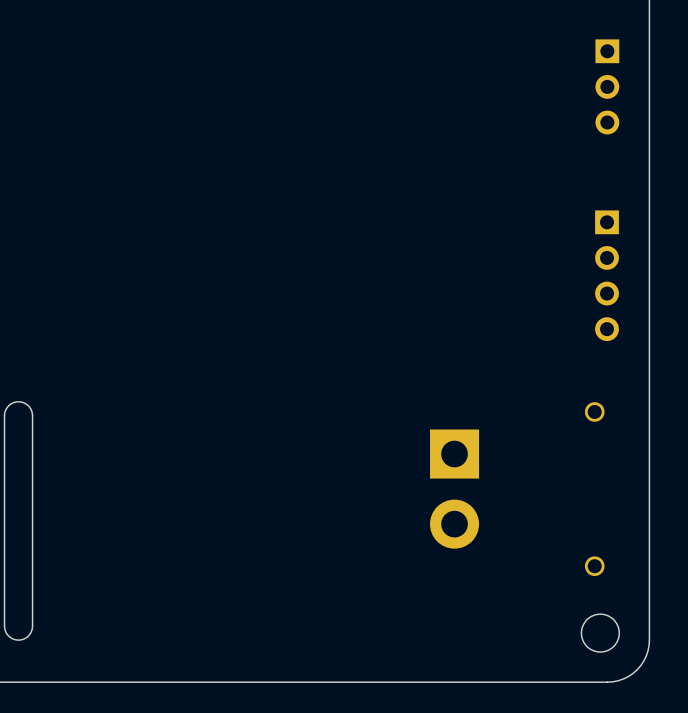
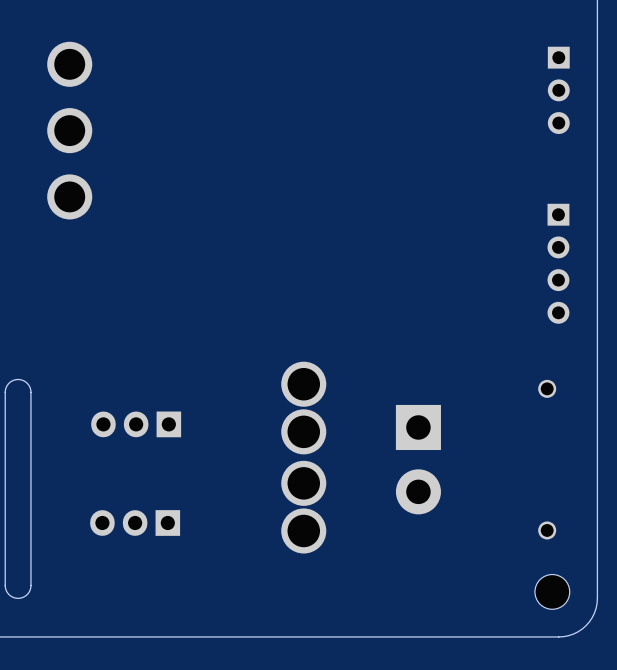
part: none -> (69, 130)
part: none -> (136, 424)
part: none -> (303, 457)
part: none -> (135, 523)

